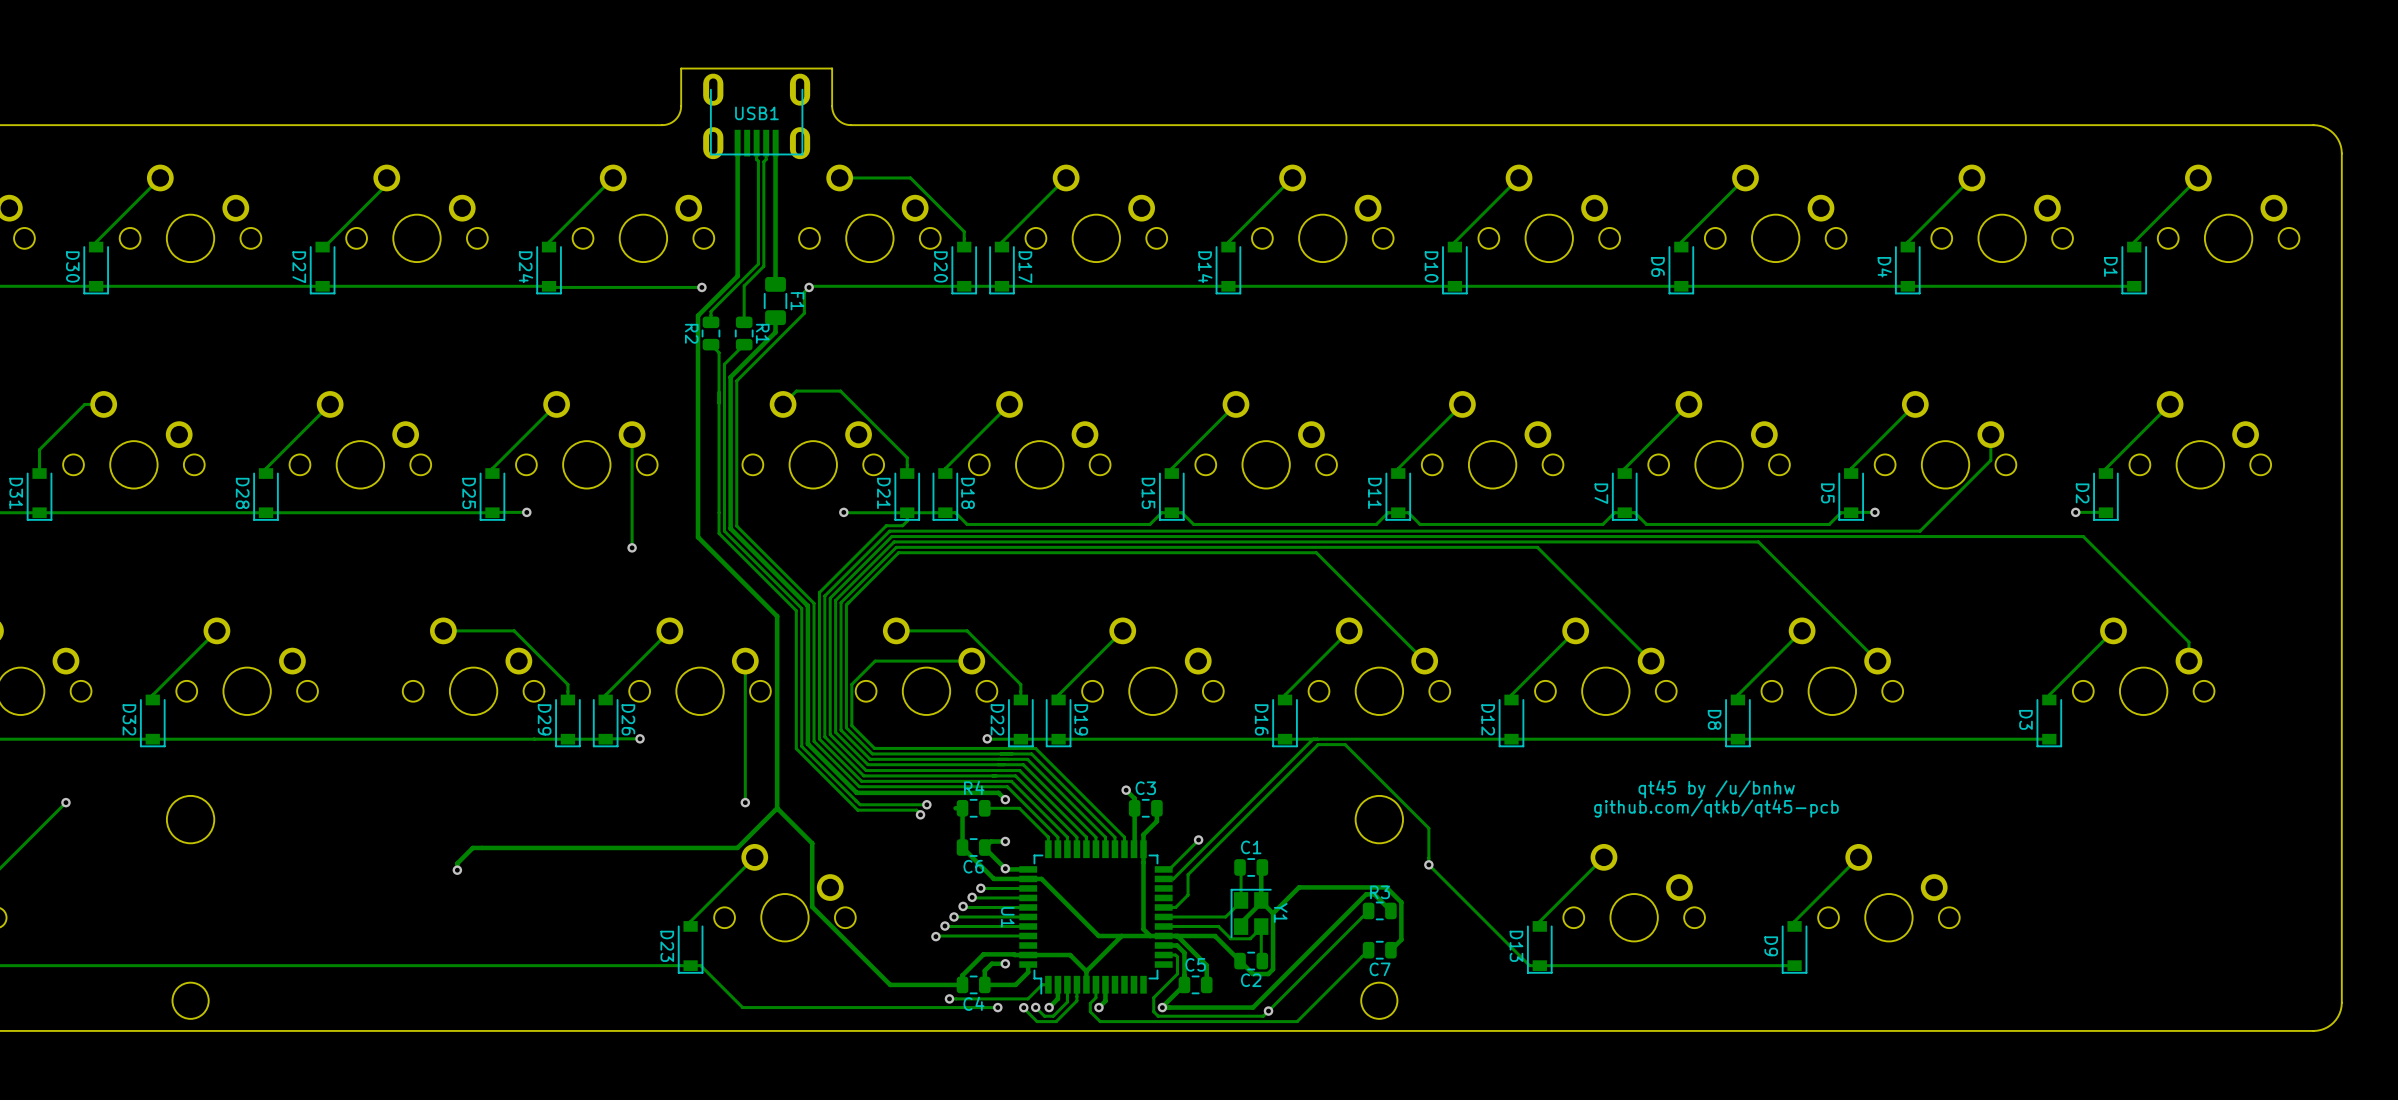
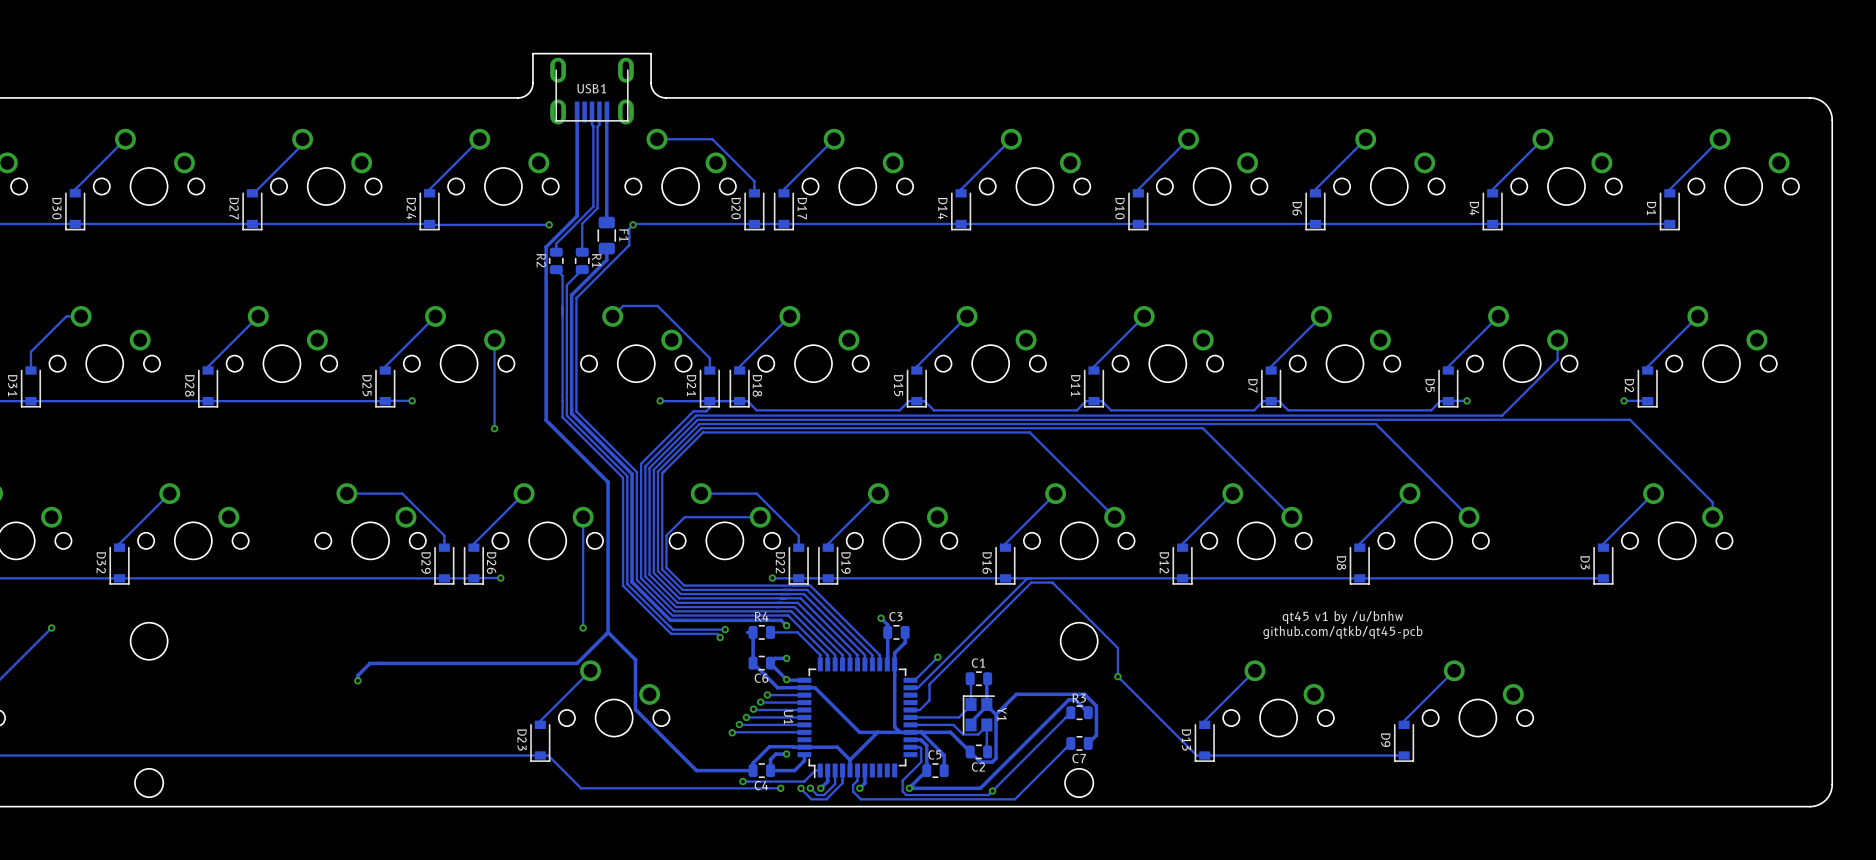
text: qt45 by /u/bnhw (1716, 789) -> qt45 v1 by /u/bnhw (1342, 617)

